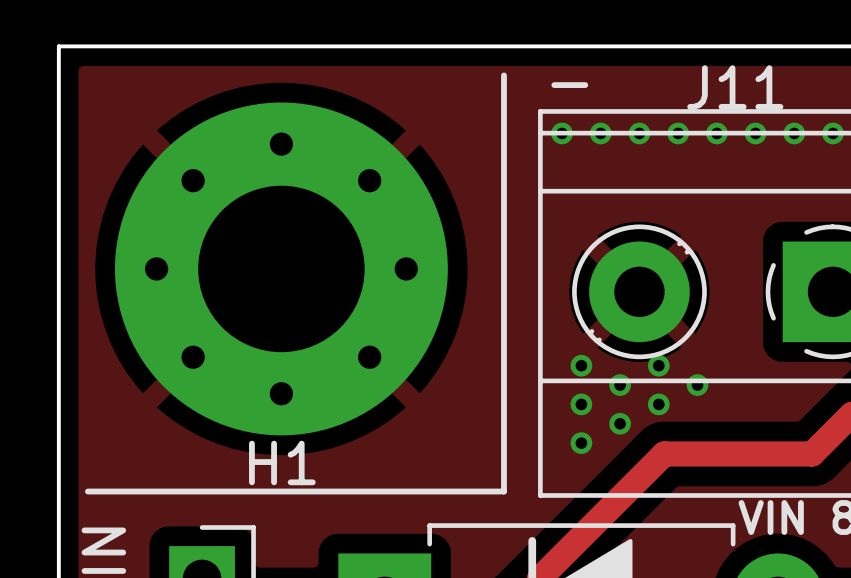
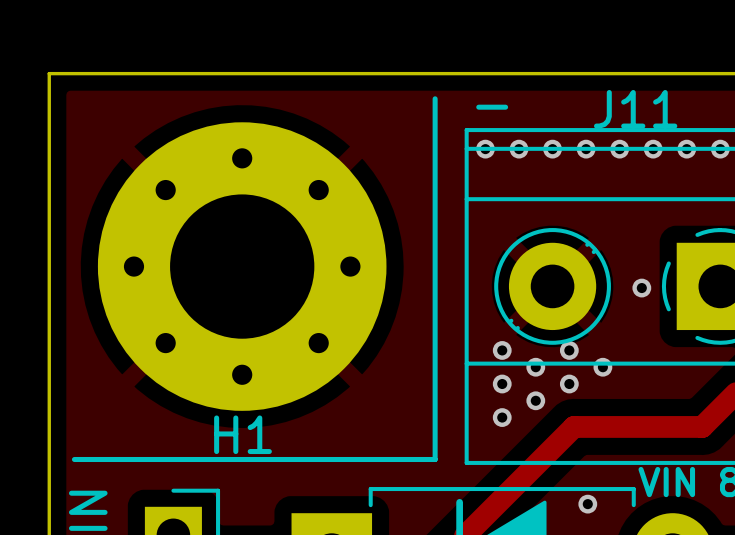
via: none -> (641, 288)
via: none -> (587, 504)

